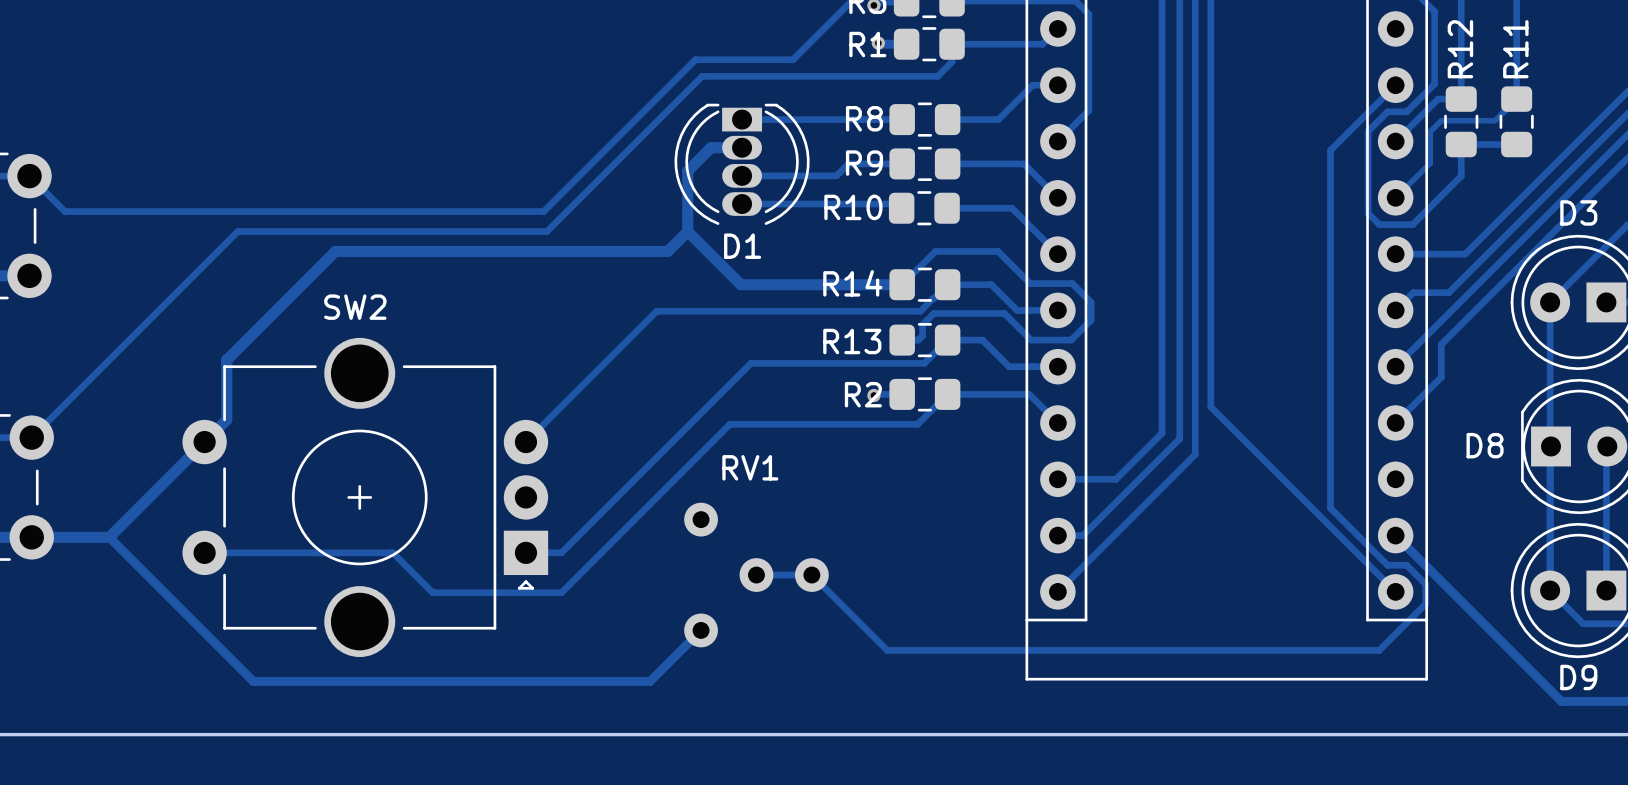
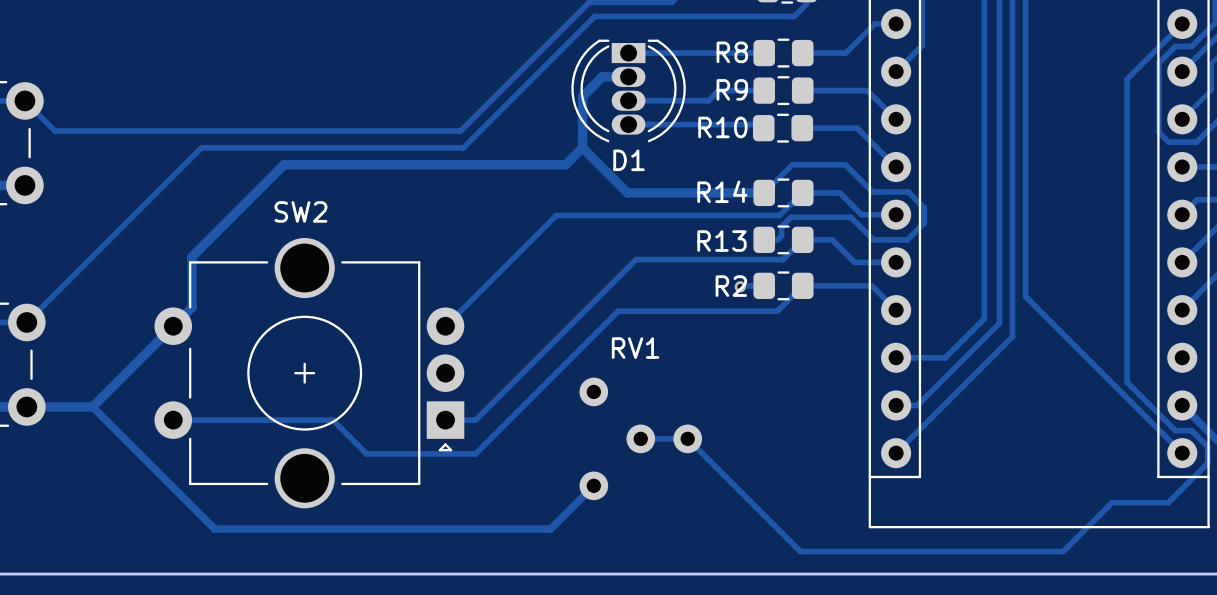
track: (887, 650) (1312, 650) -> (751, 502) (800, 551) (1063, 551) (1112, 502)

